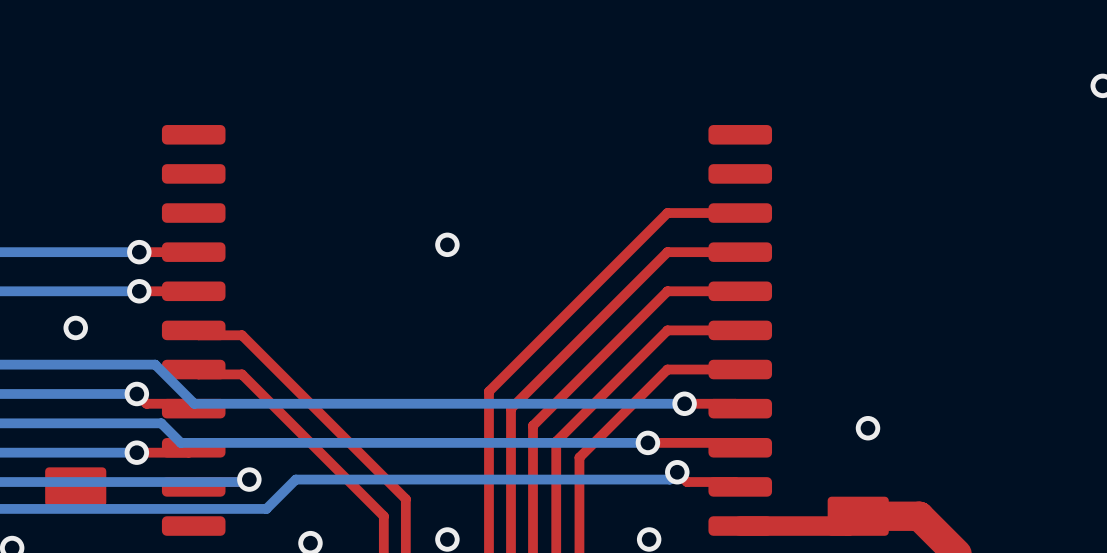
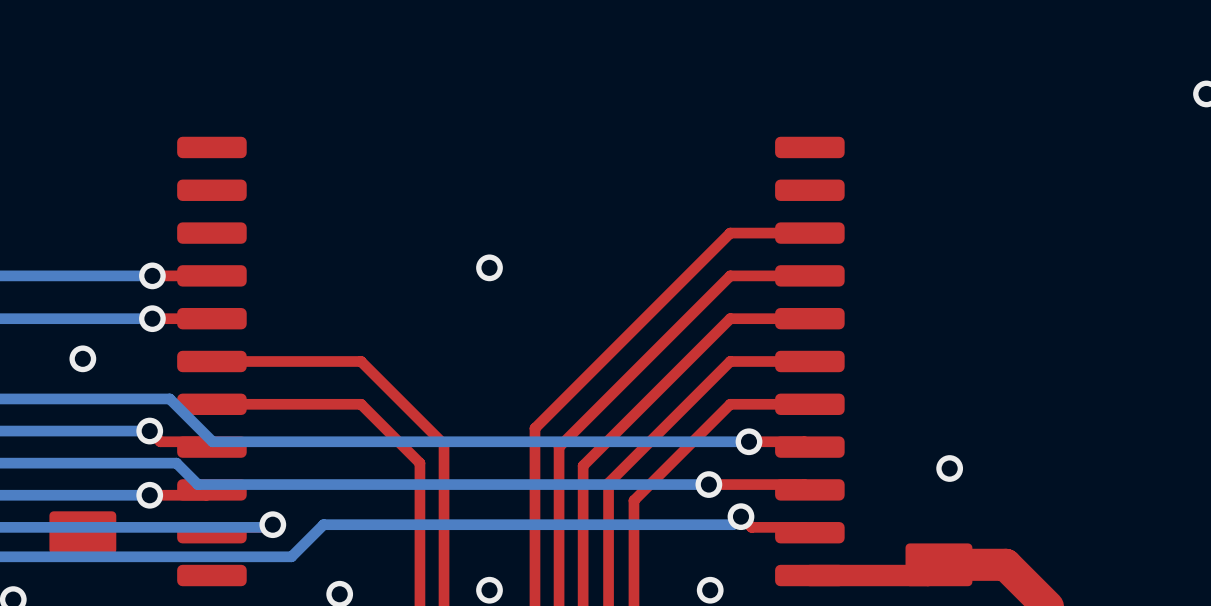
top track: (193, 330) (198, 335) (242, 335) (405, 499) -> (211, 361) (361, 361) (444, 444) (444, 546)
top track: (193, 369) (198, 374) (242, 374) (383, 516) -> (211, 404) (361, 404) (419, 463) (419, 564)

